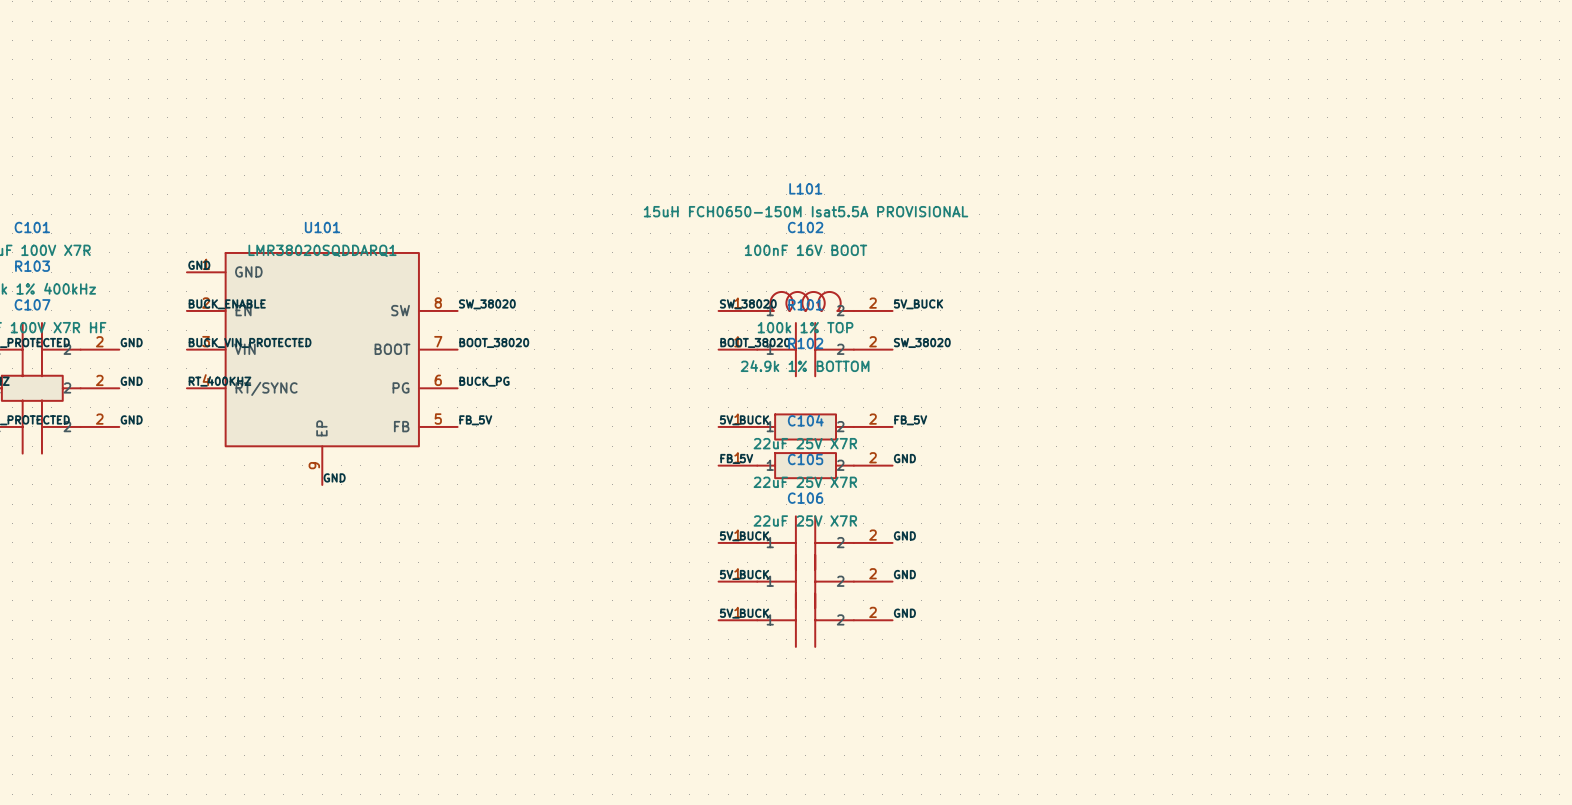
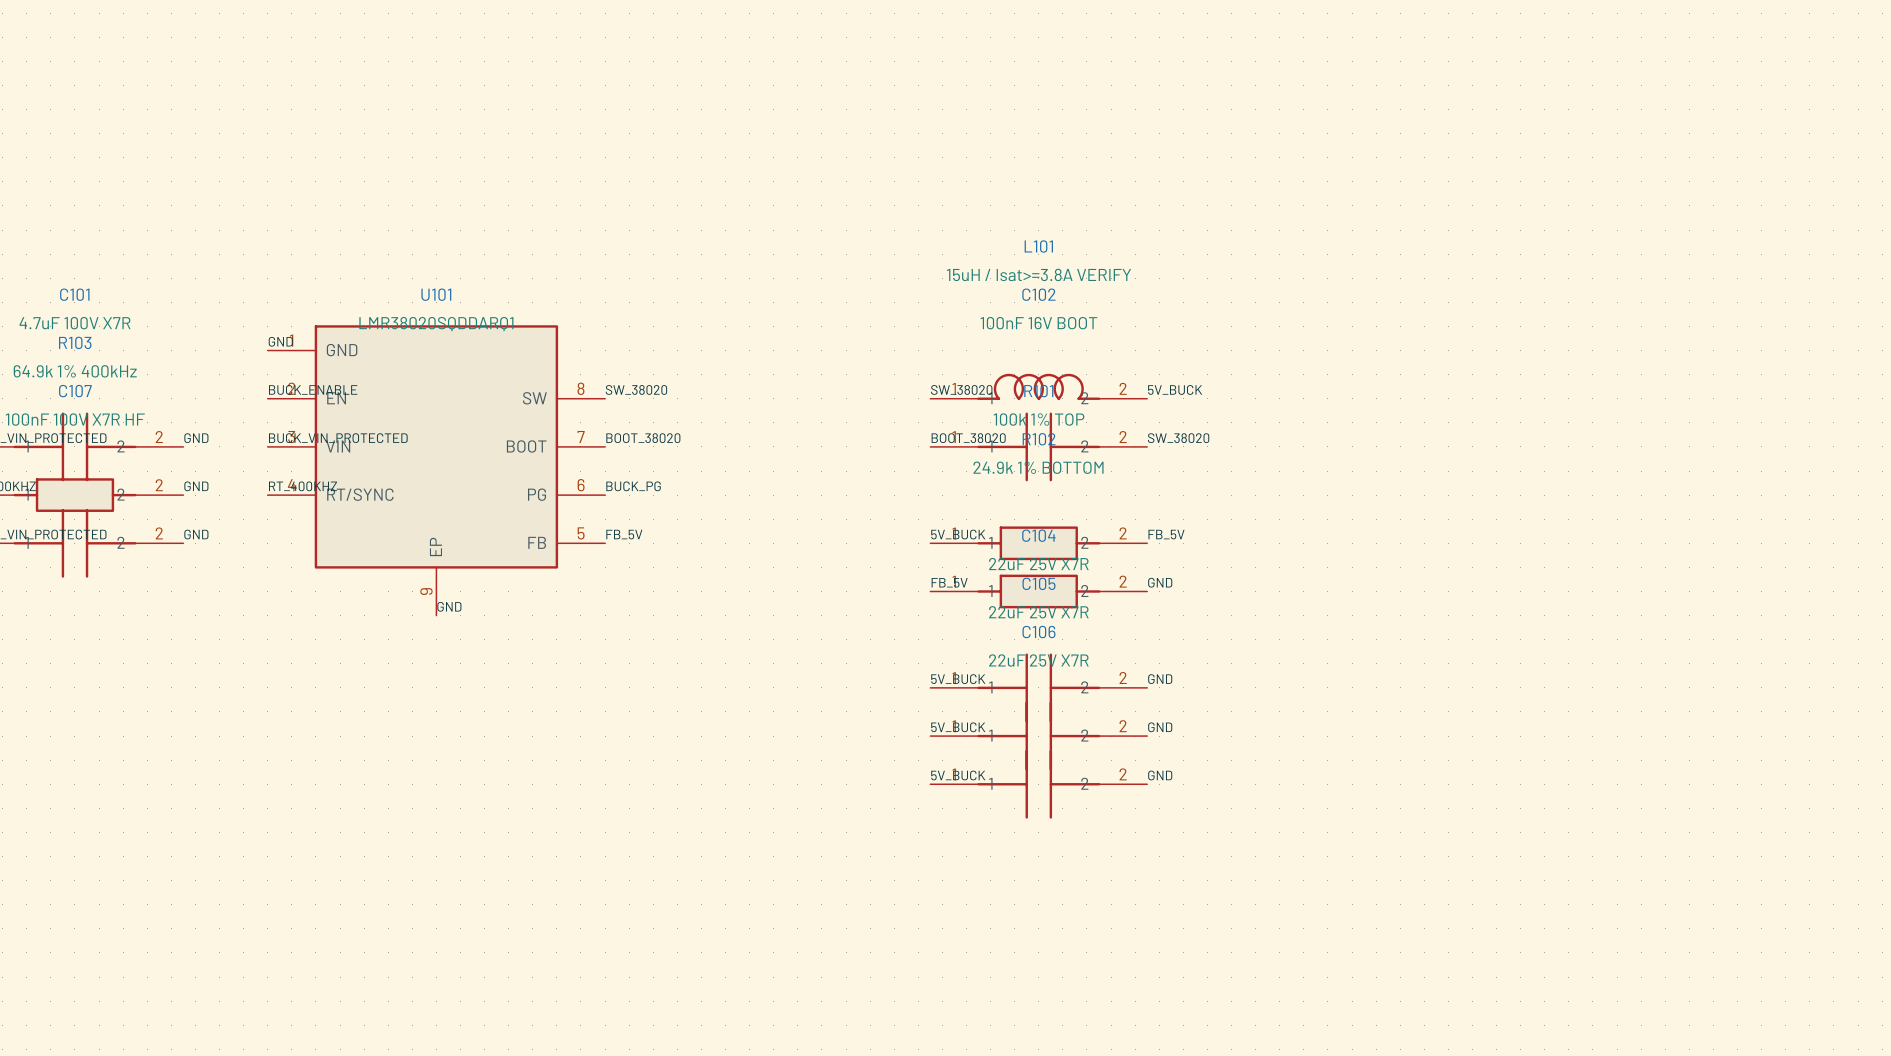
L101 value: 15uH FCH0650-150M Isat5.5A PROVISIONAL (806, 211) -> 15uH / Isat>=3.8A VERIFY (1038, 274)

